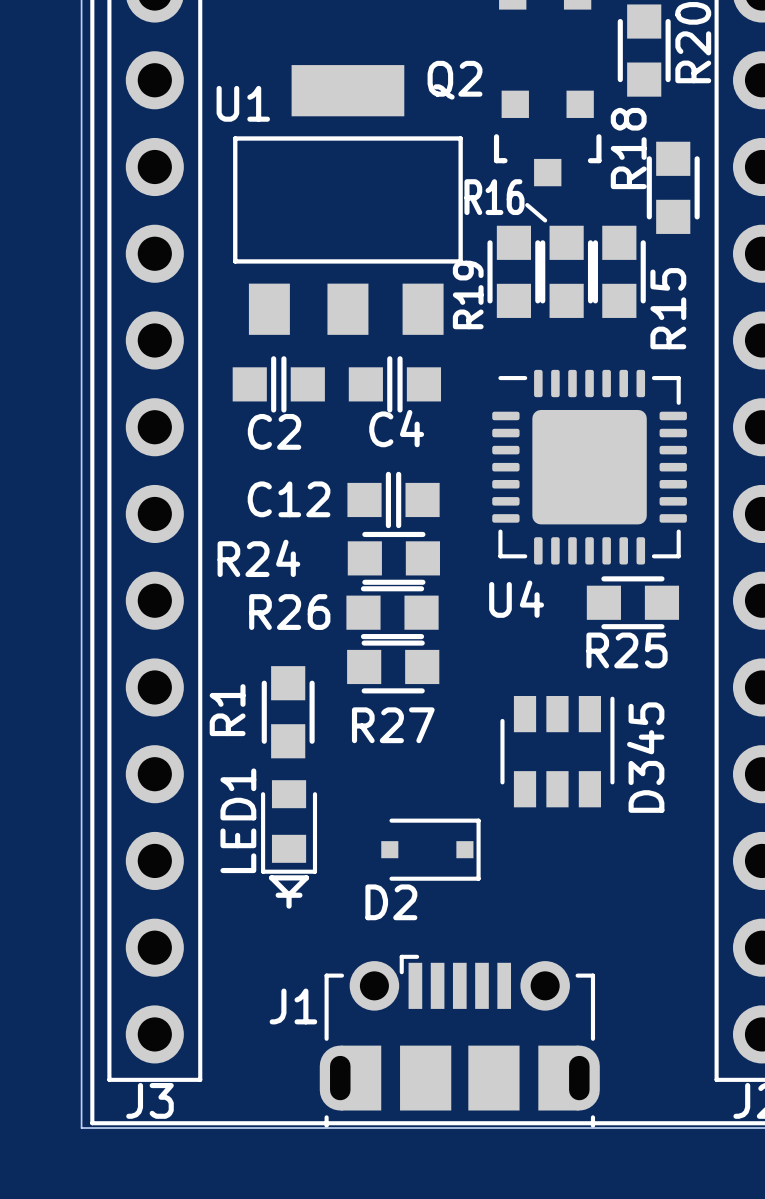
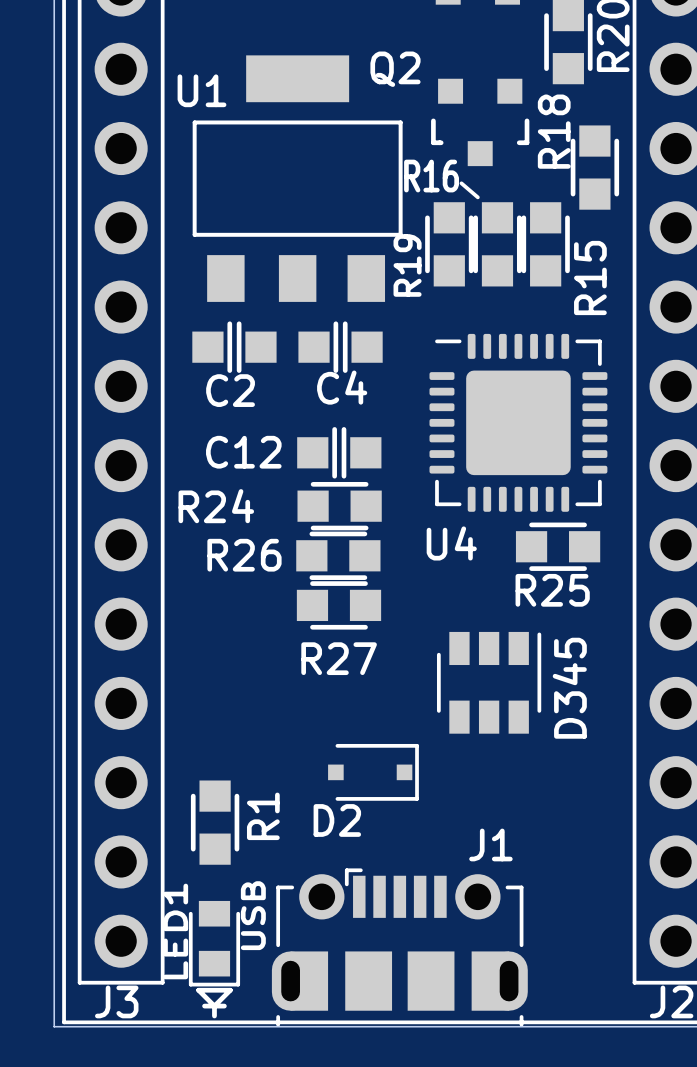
R1 name position: R1 (227, 710) -> R1 (263, 816)
R1 position: (288, 712) -> (215, 822)
LED1 name position: LED1 (238, 820) -> LED1 (175, 931)
LED1 position: (289, 844) -> (214, 959)
J1 name position: J1 (293, 1006) -> J1 (490, 844)
text: none -> USB (253, 915)

